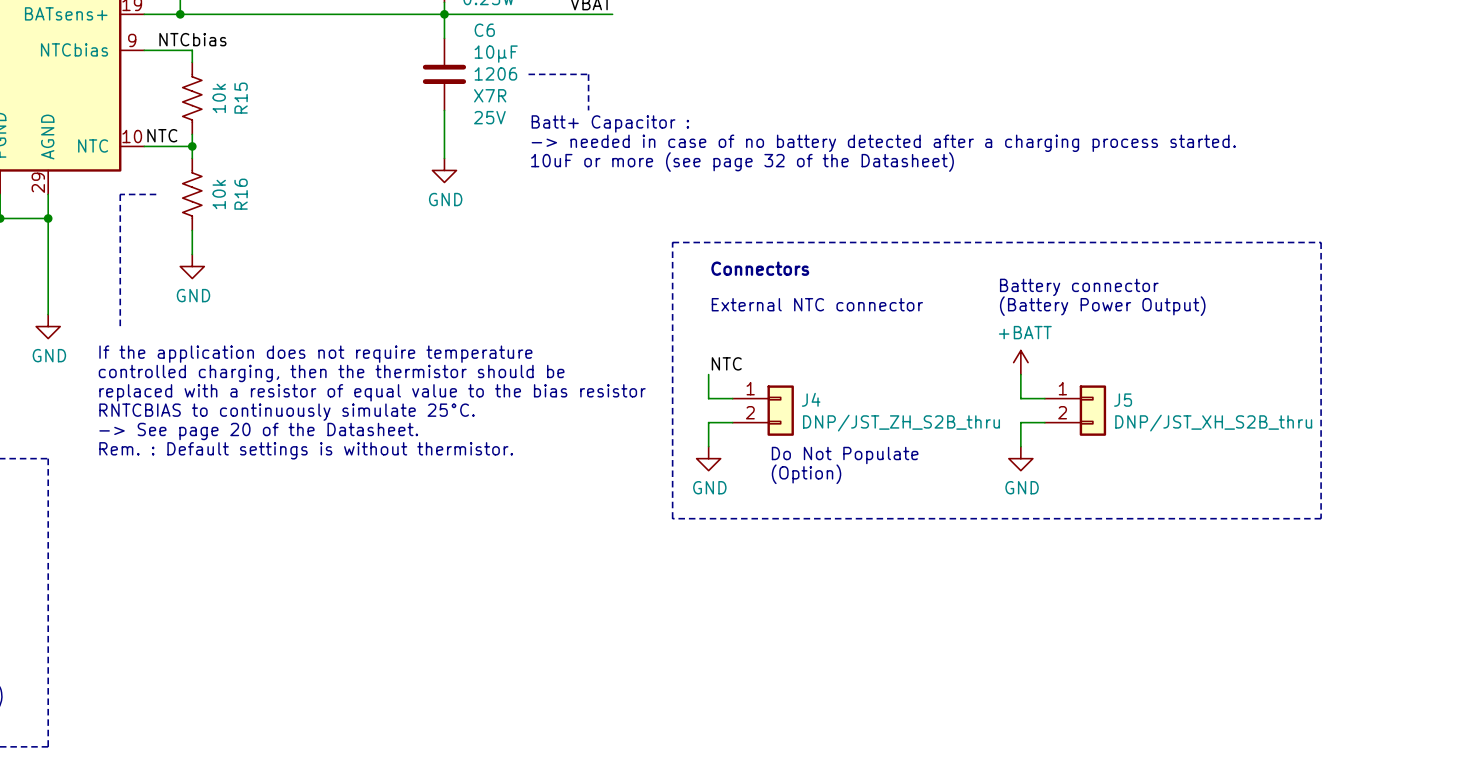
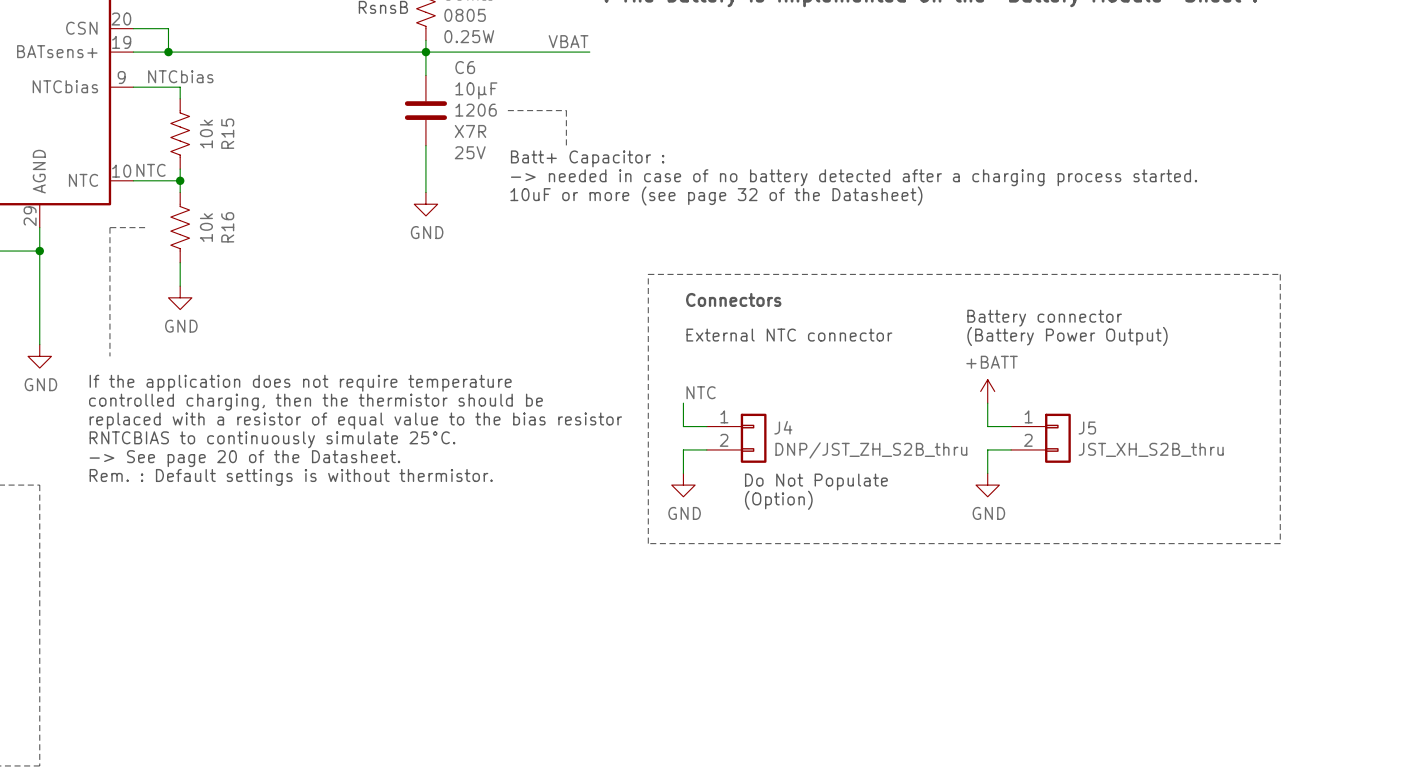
J5 value: DNP/JST_XH_S2B_thru (1213, 423) -> JST_XH_S2B_thru (1151, 449)

